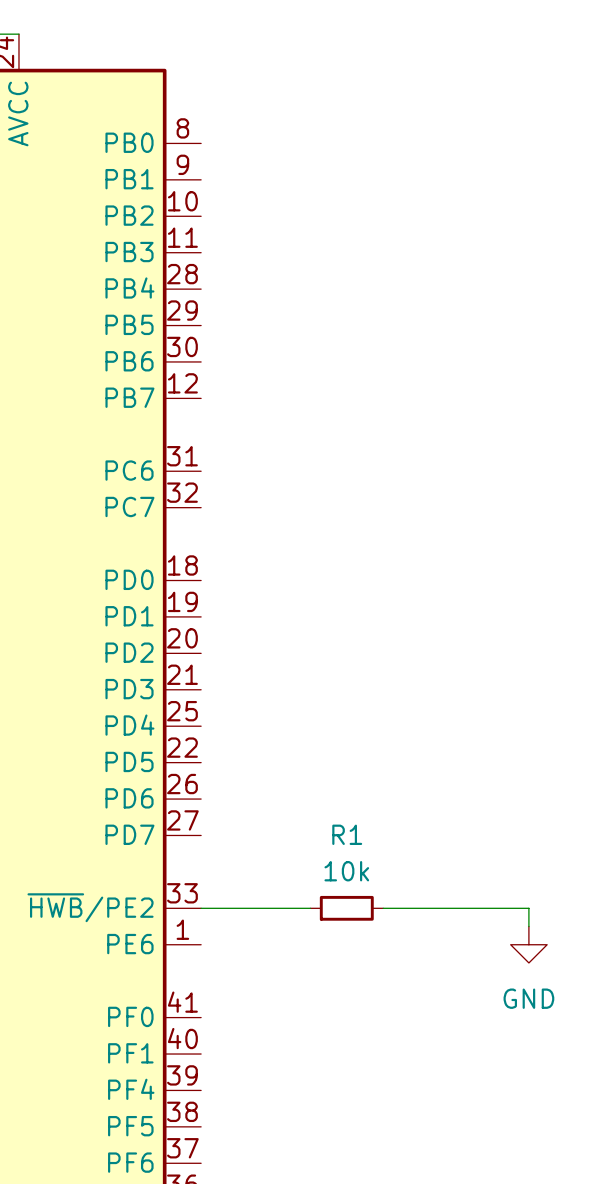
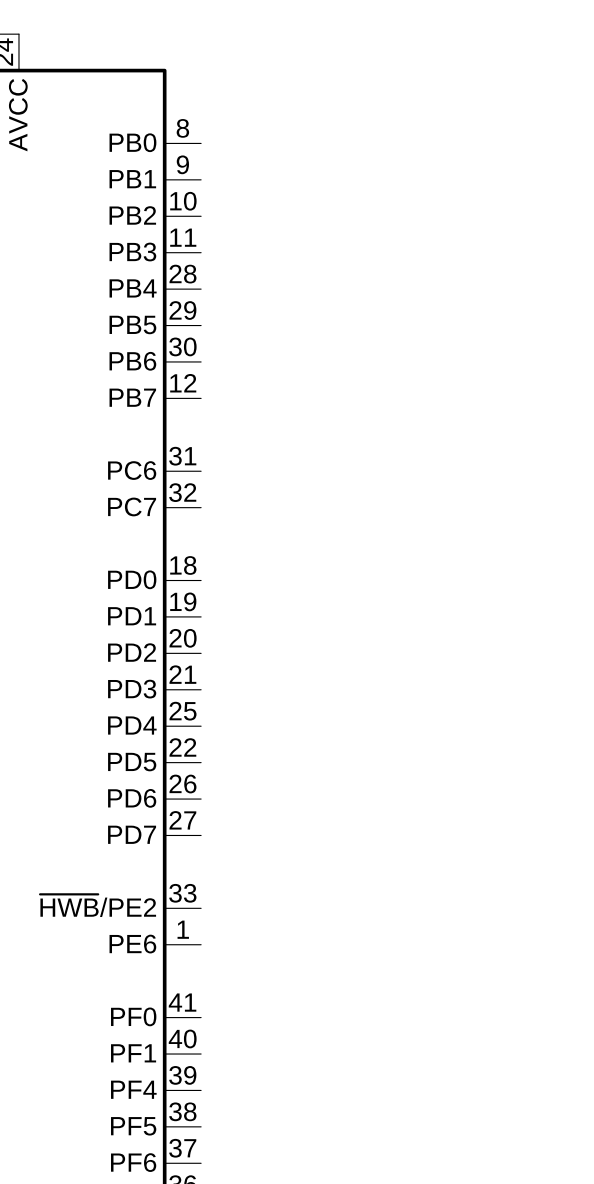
wire: (201, 908) (310, 908) -> none
R1: 10k (346, 908) -> none
wire: (383, 908) (528, 908) (528, 926) -> none
power symbol: GND (528, 944) -> none

